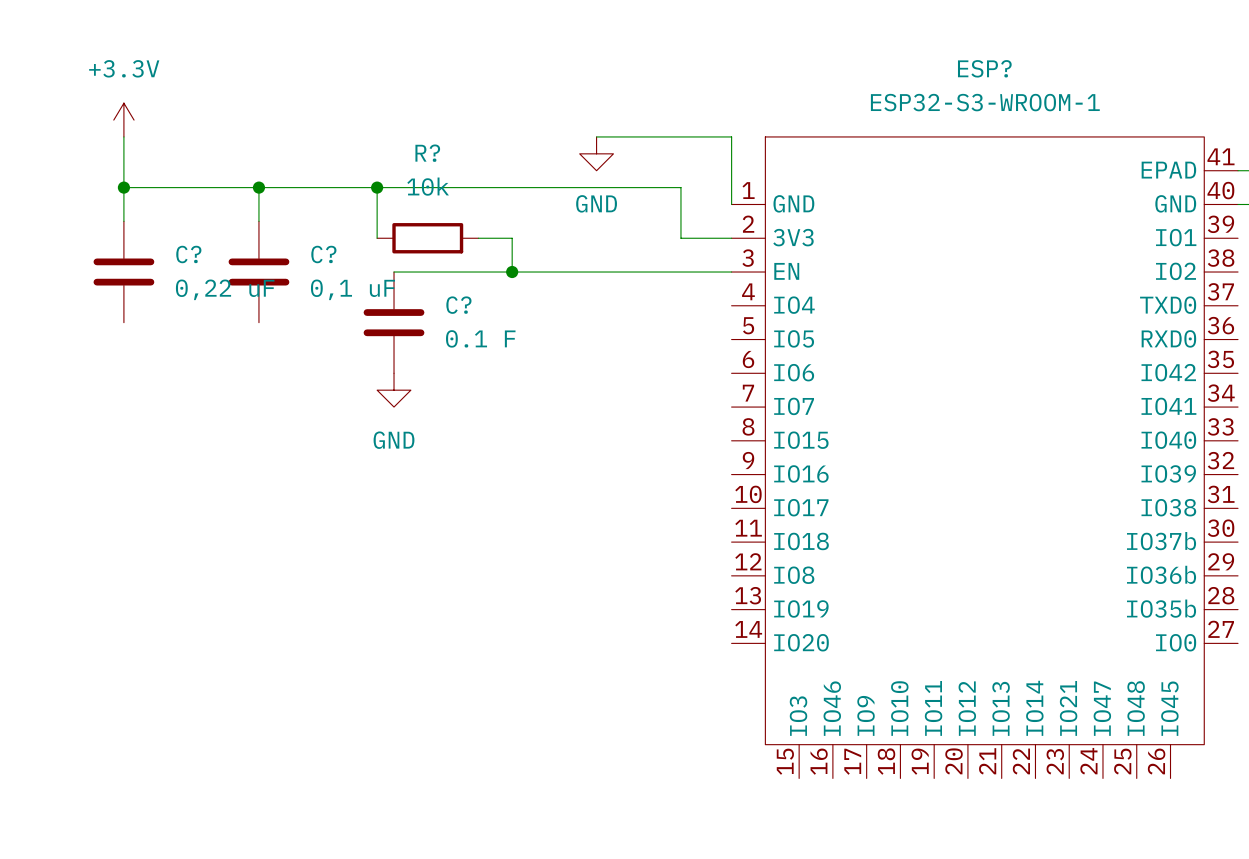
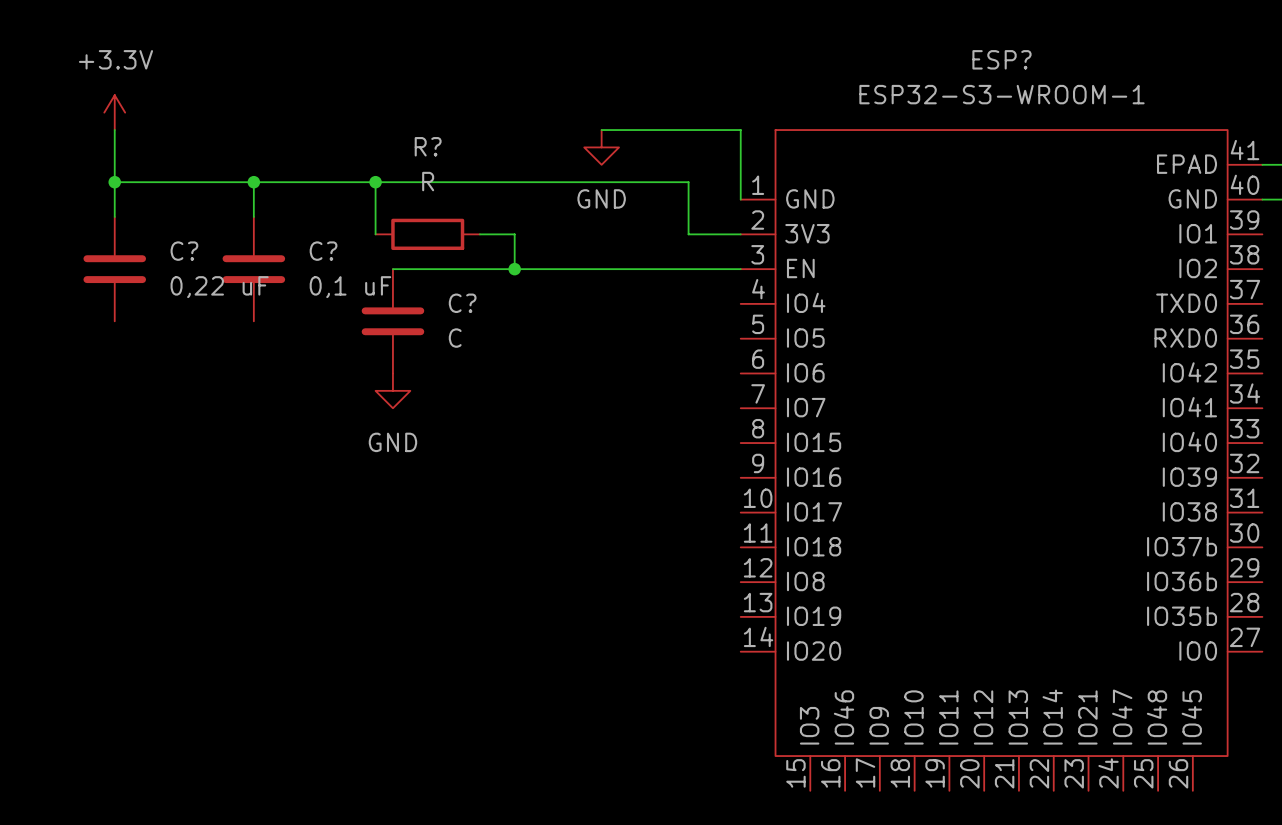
R? value: 10k (428, 186) -> R (428, 181)
C? value: 0.1 F (480, 338) -> C (455, 338)

